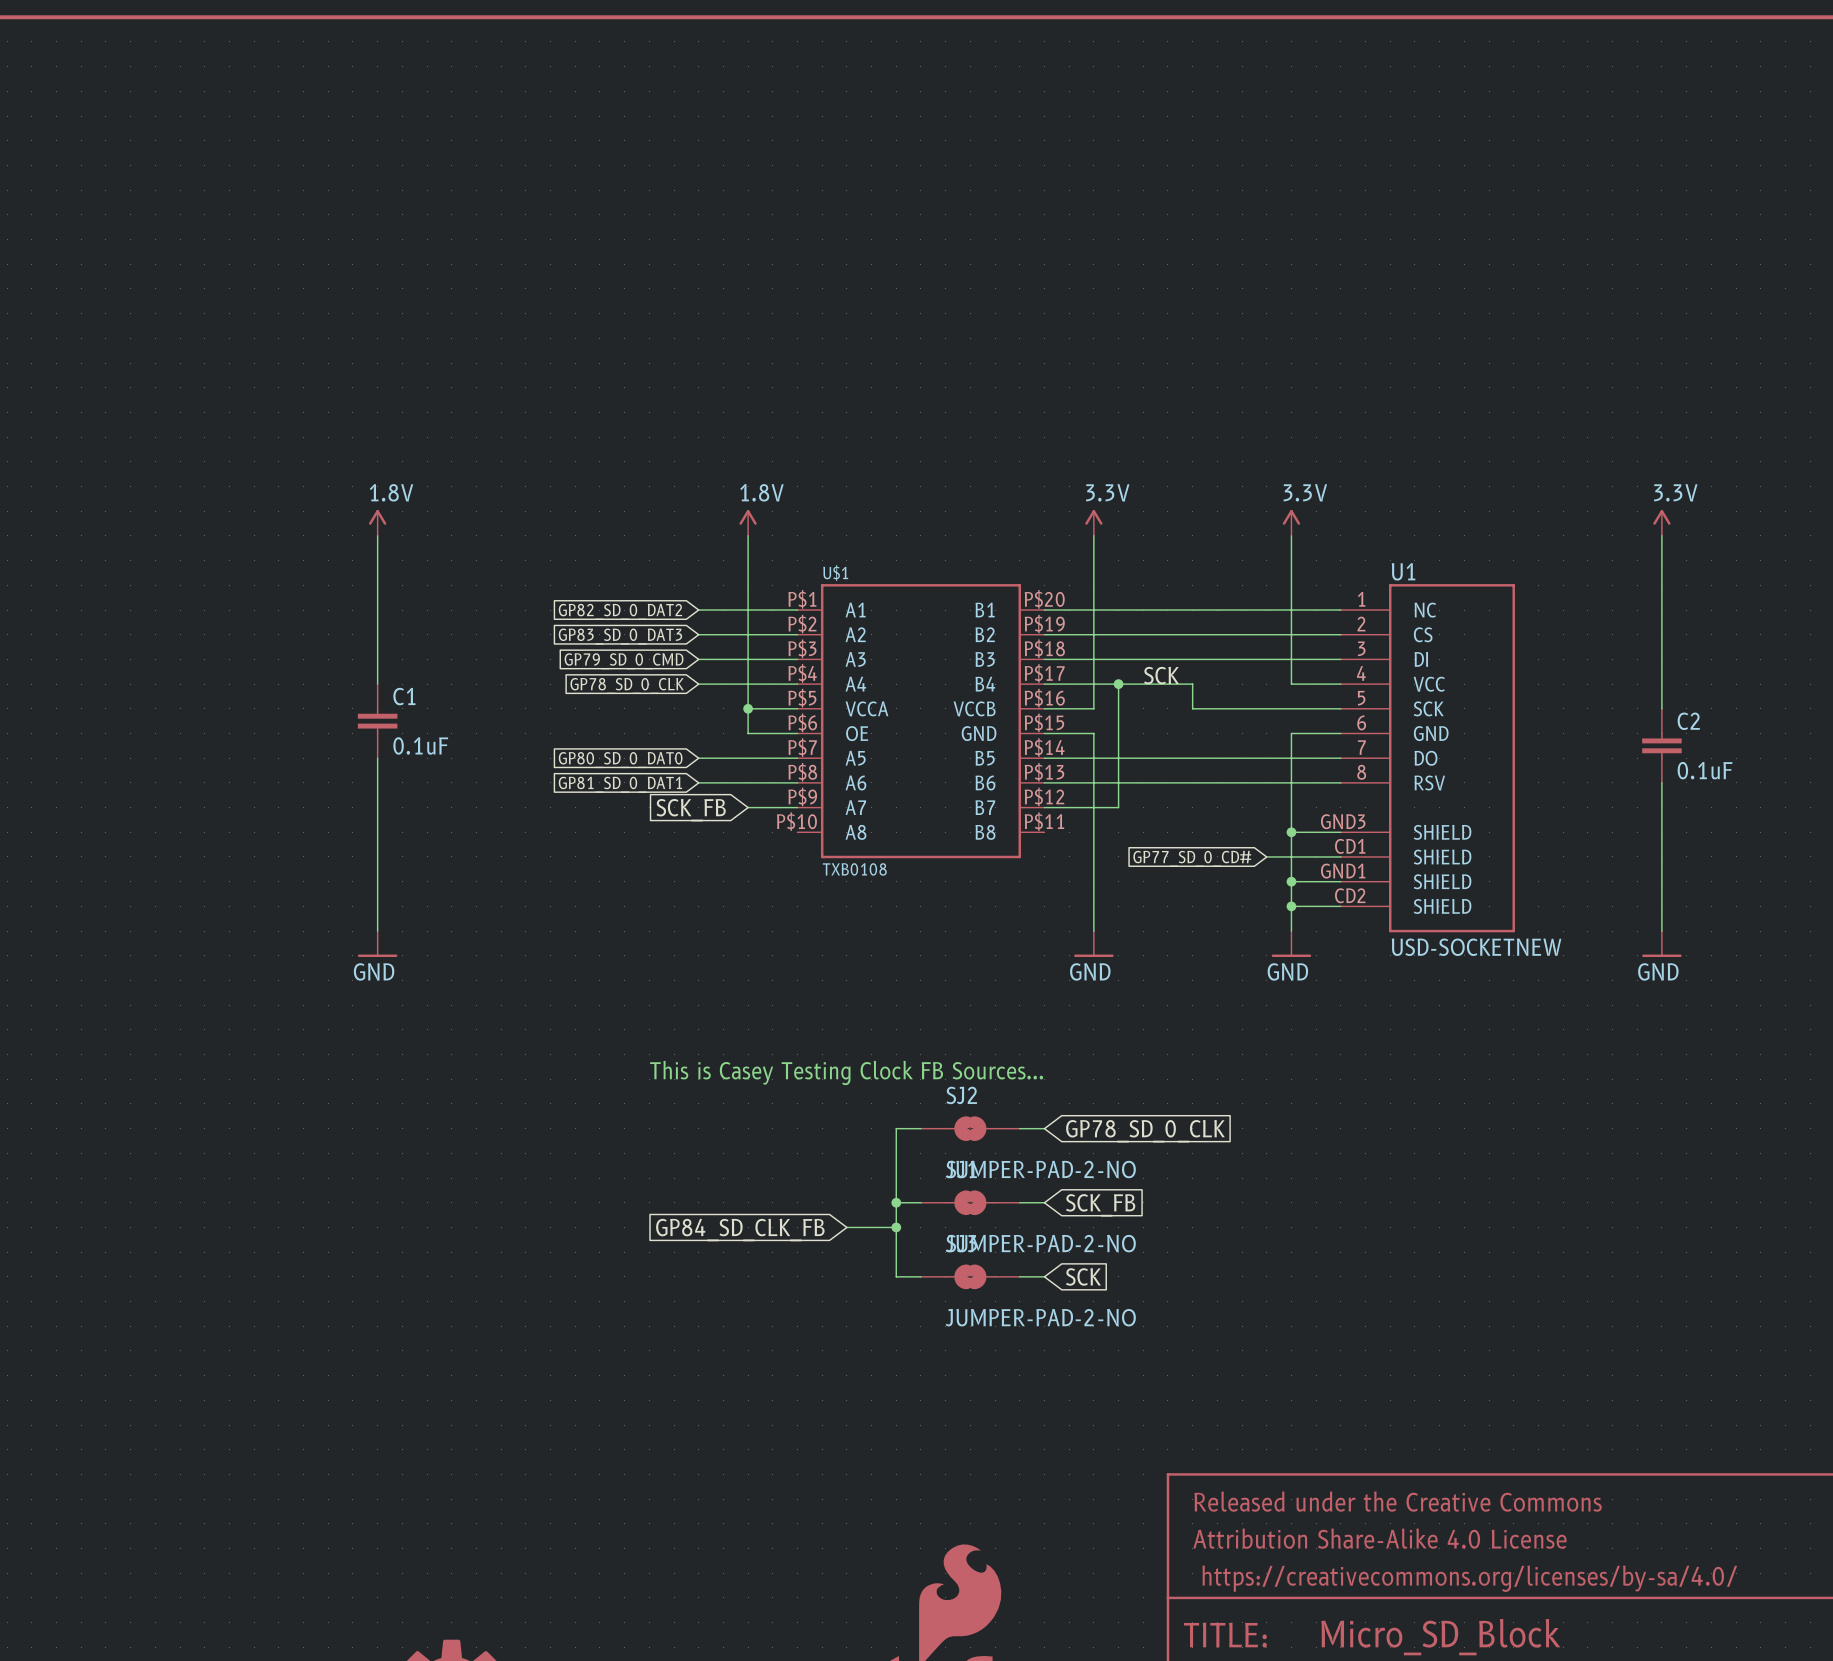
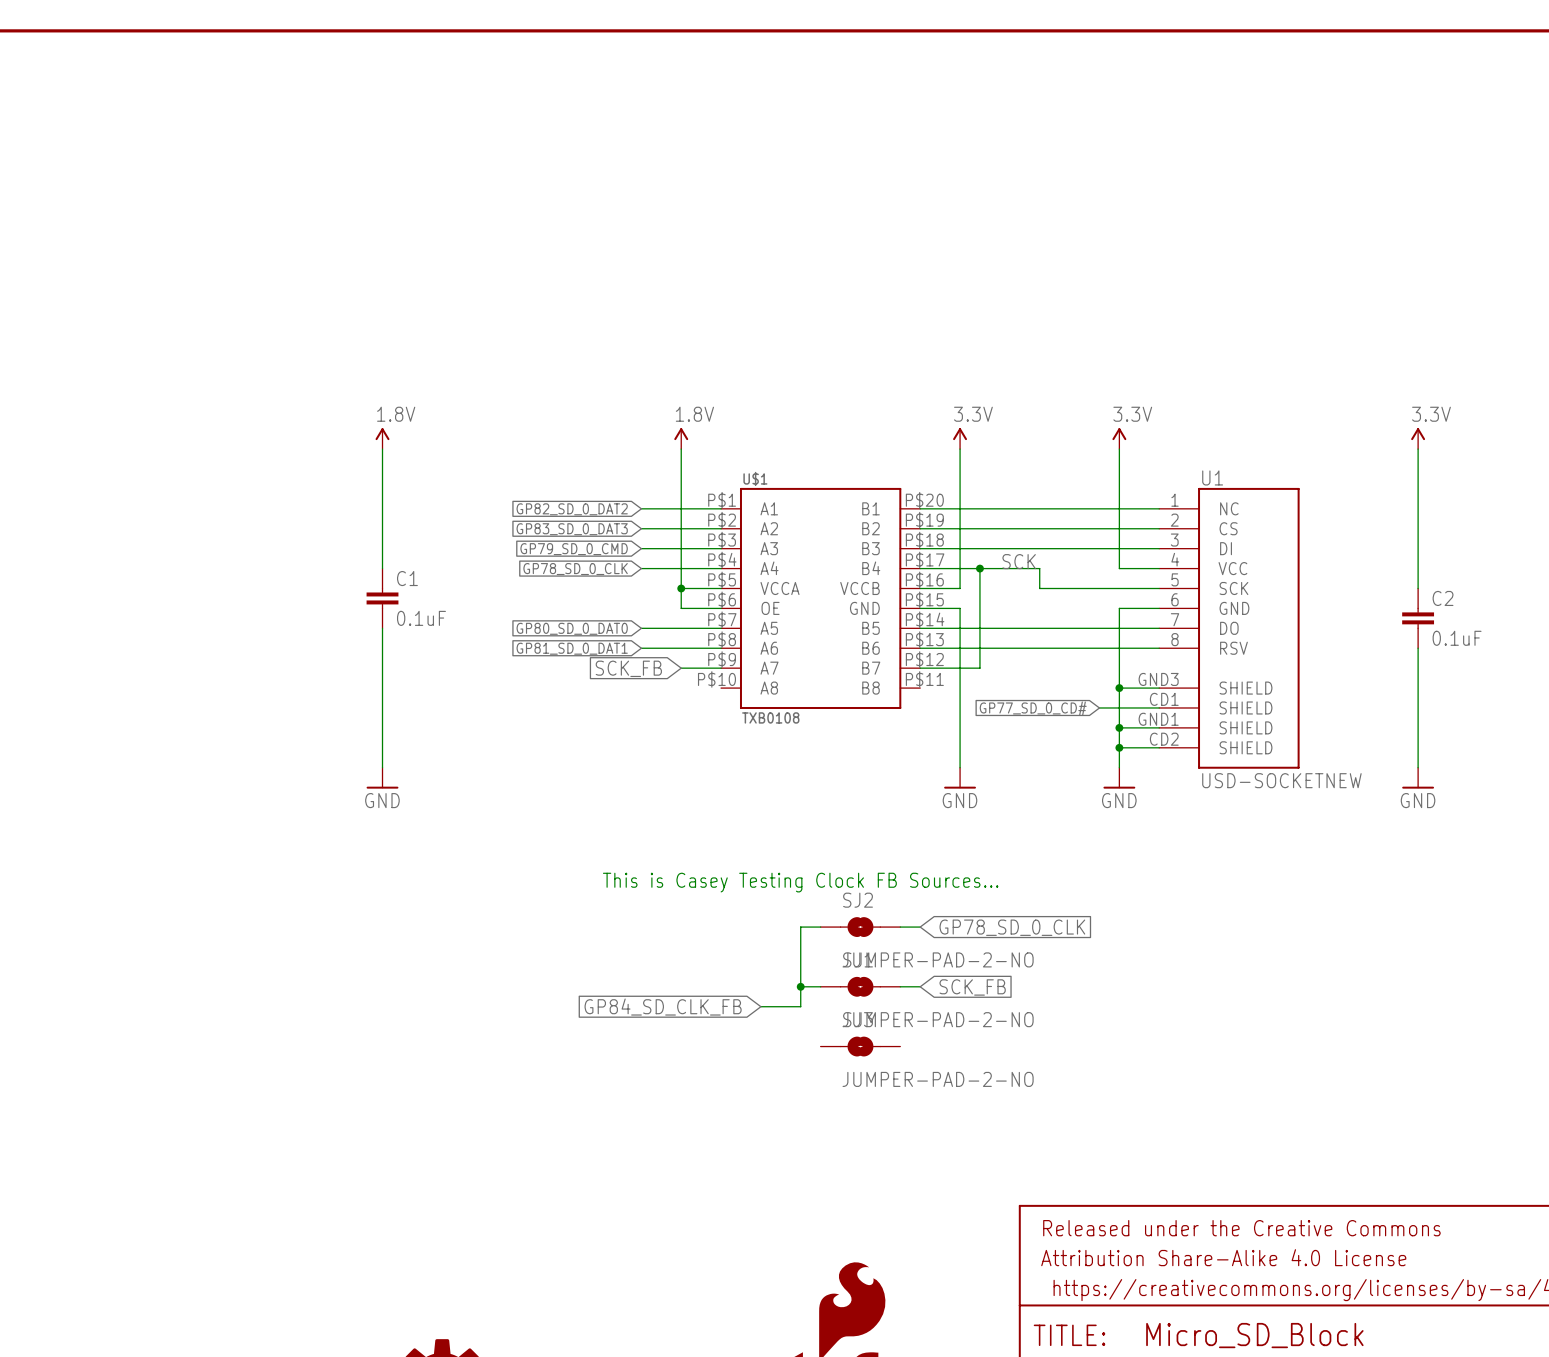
wire: (896, 1227) (896, 1276) (920, 1276) -> none
junction: (896, 1227) -> none
wire: (1019, 1276) (1044, 1276) -> none
global label: SCK (1083, 1276) -> none

